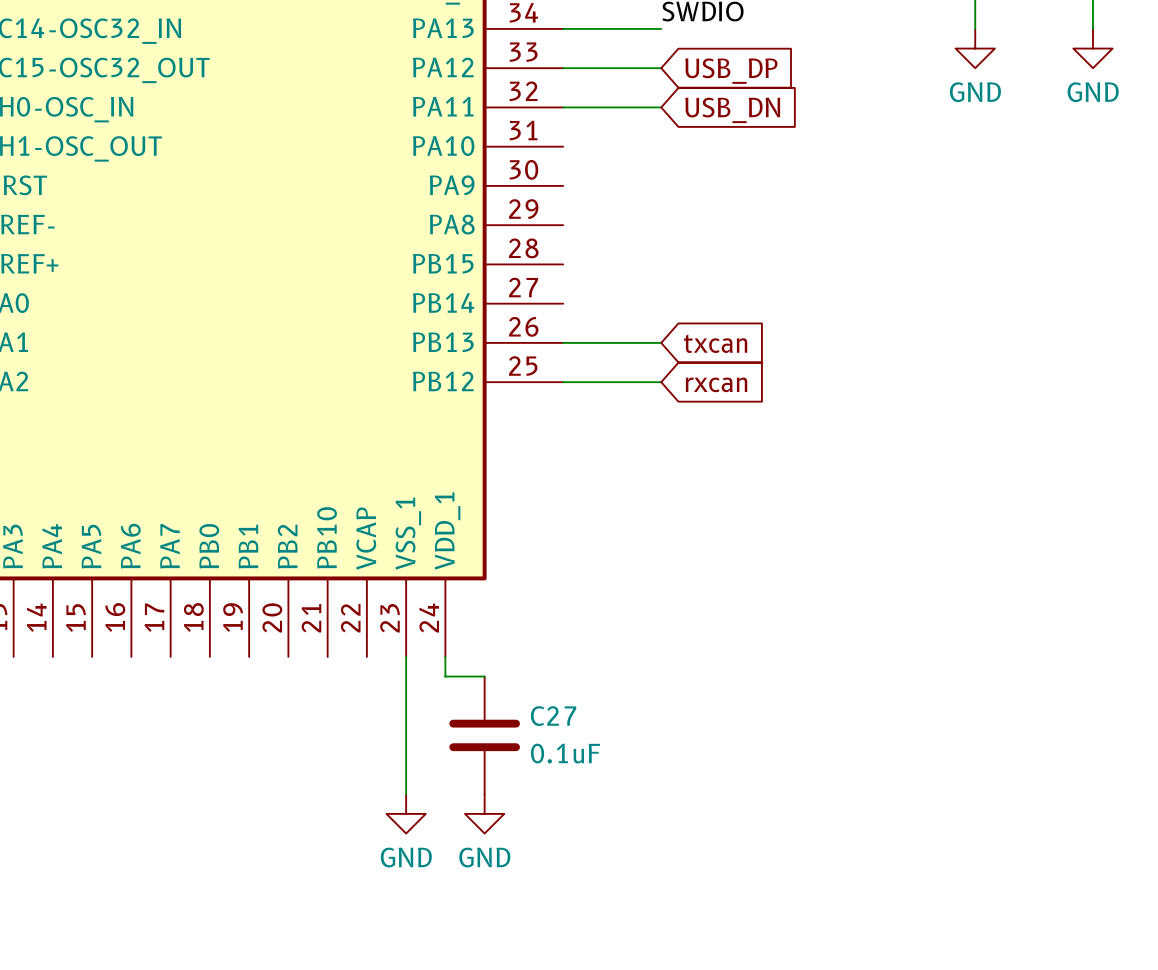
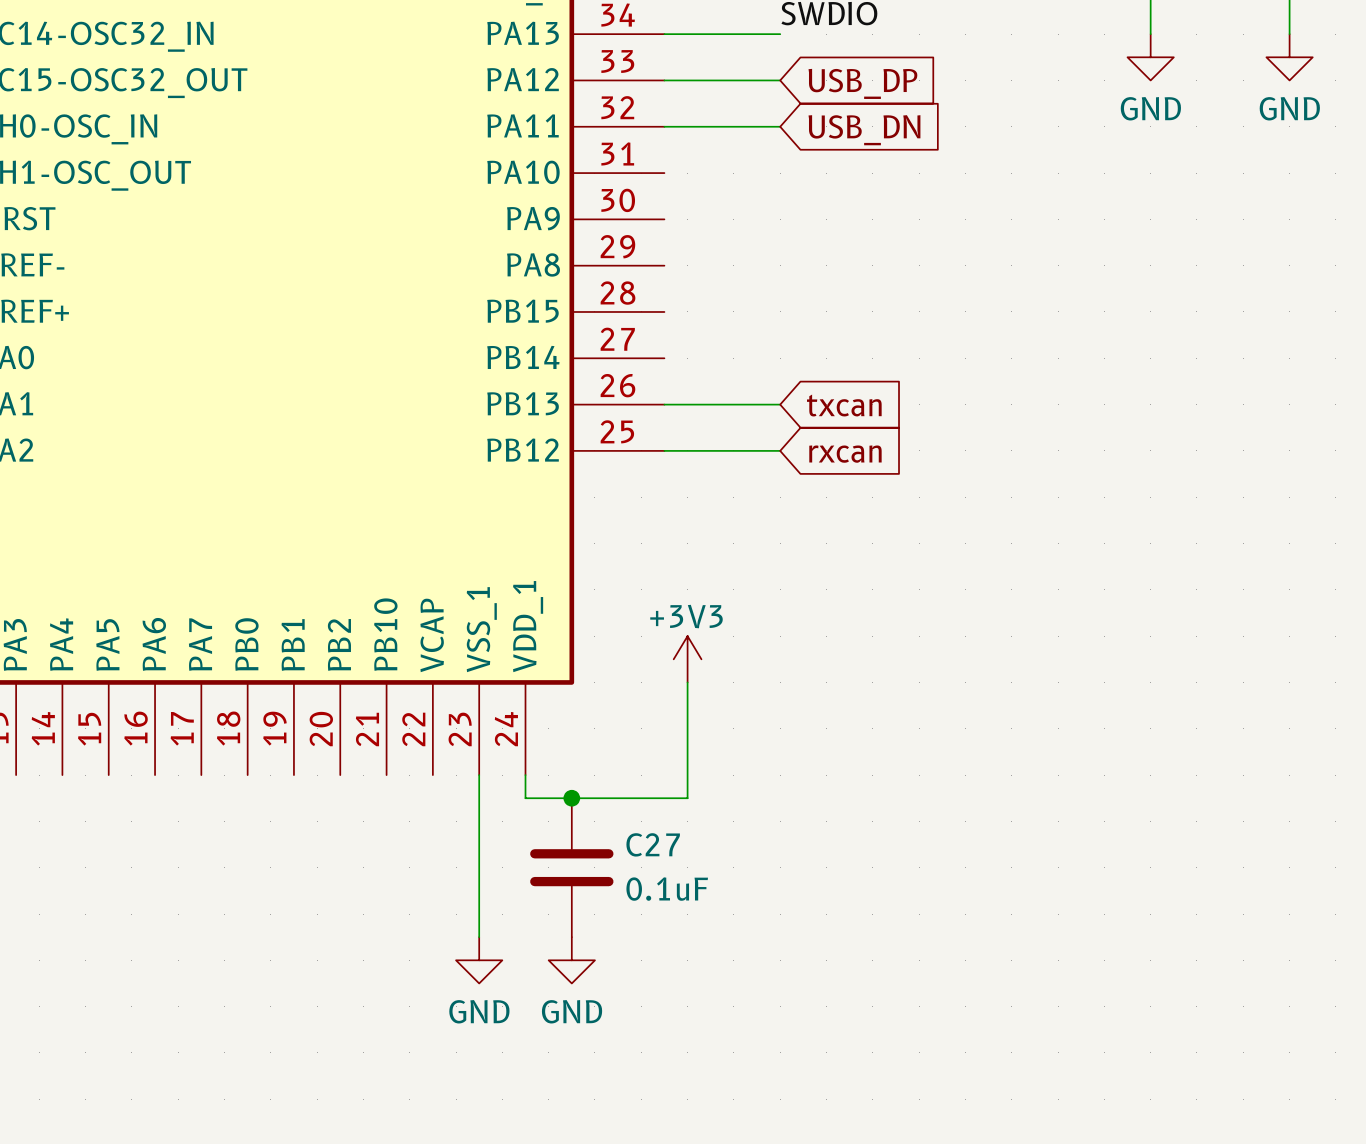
power symbol: none -> +3V3 (687, 659)
wire: none -> (687, 682) (687, 798) (571, 798)
junction: none -> (571, 798)

